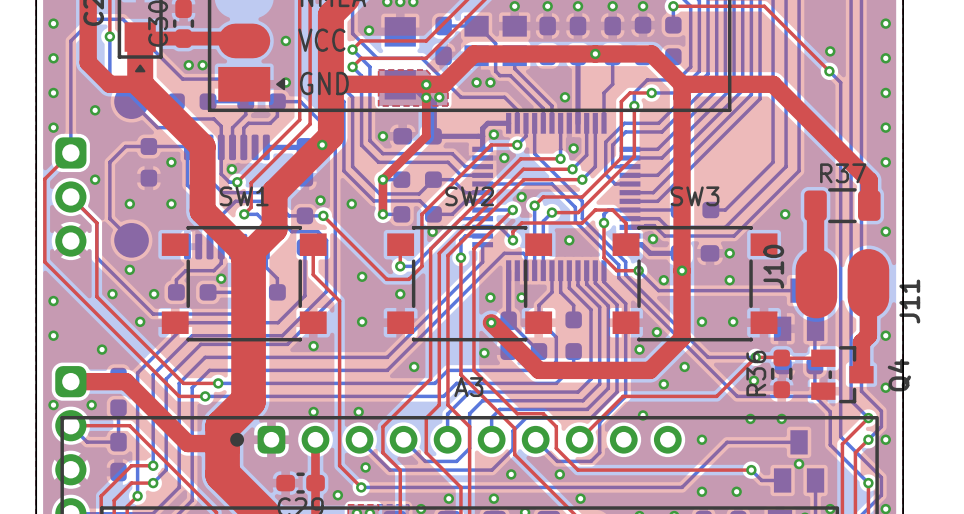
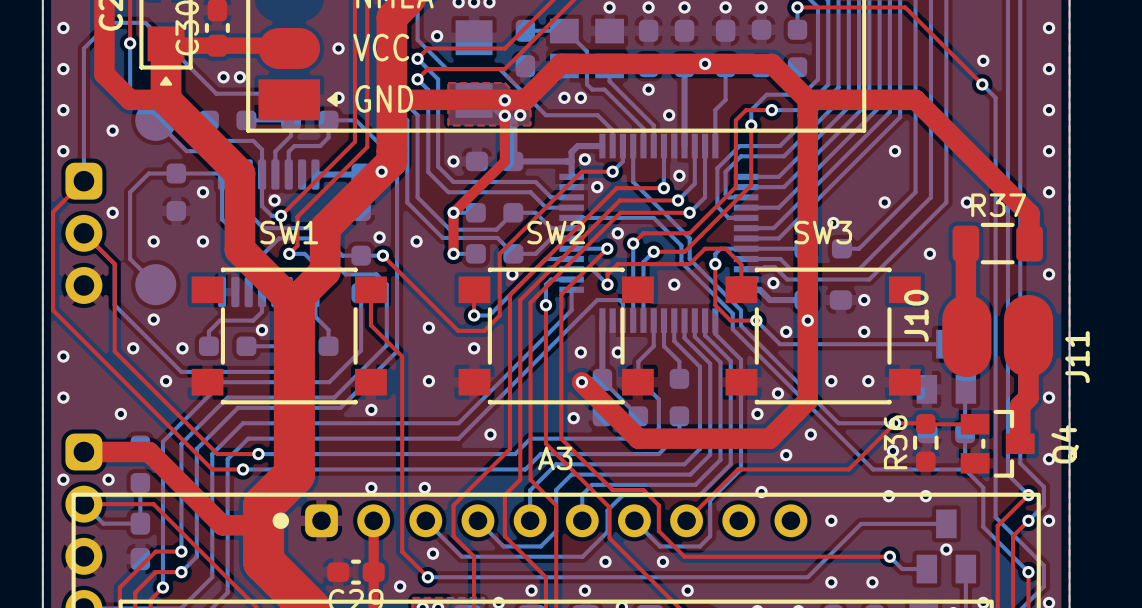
via: none -> (648, 89)
via: none -> (895, 151)
via: none -> (884, 202)
via: none -> (966, 202)
via: none -> (833, 223)

